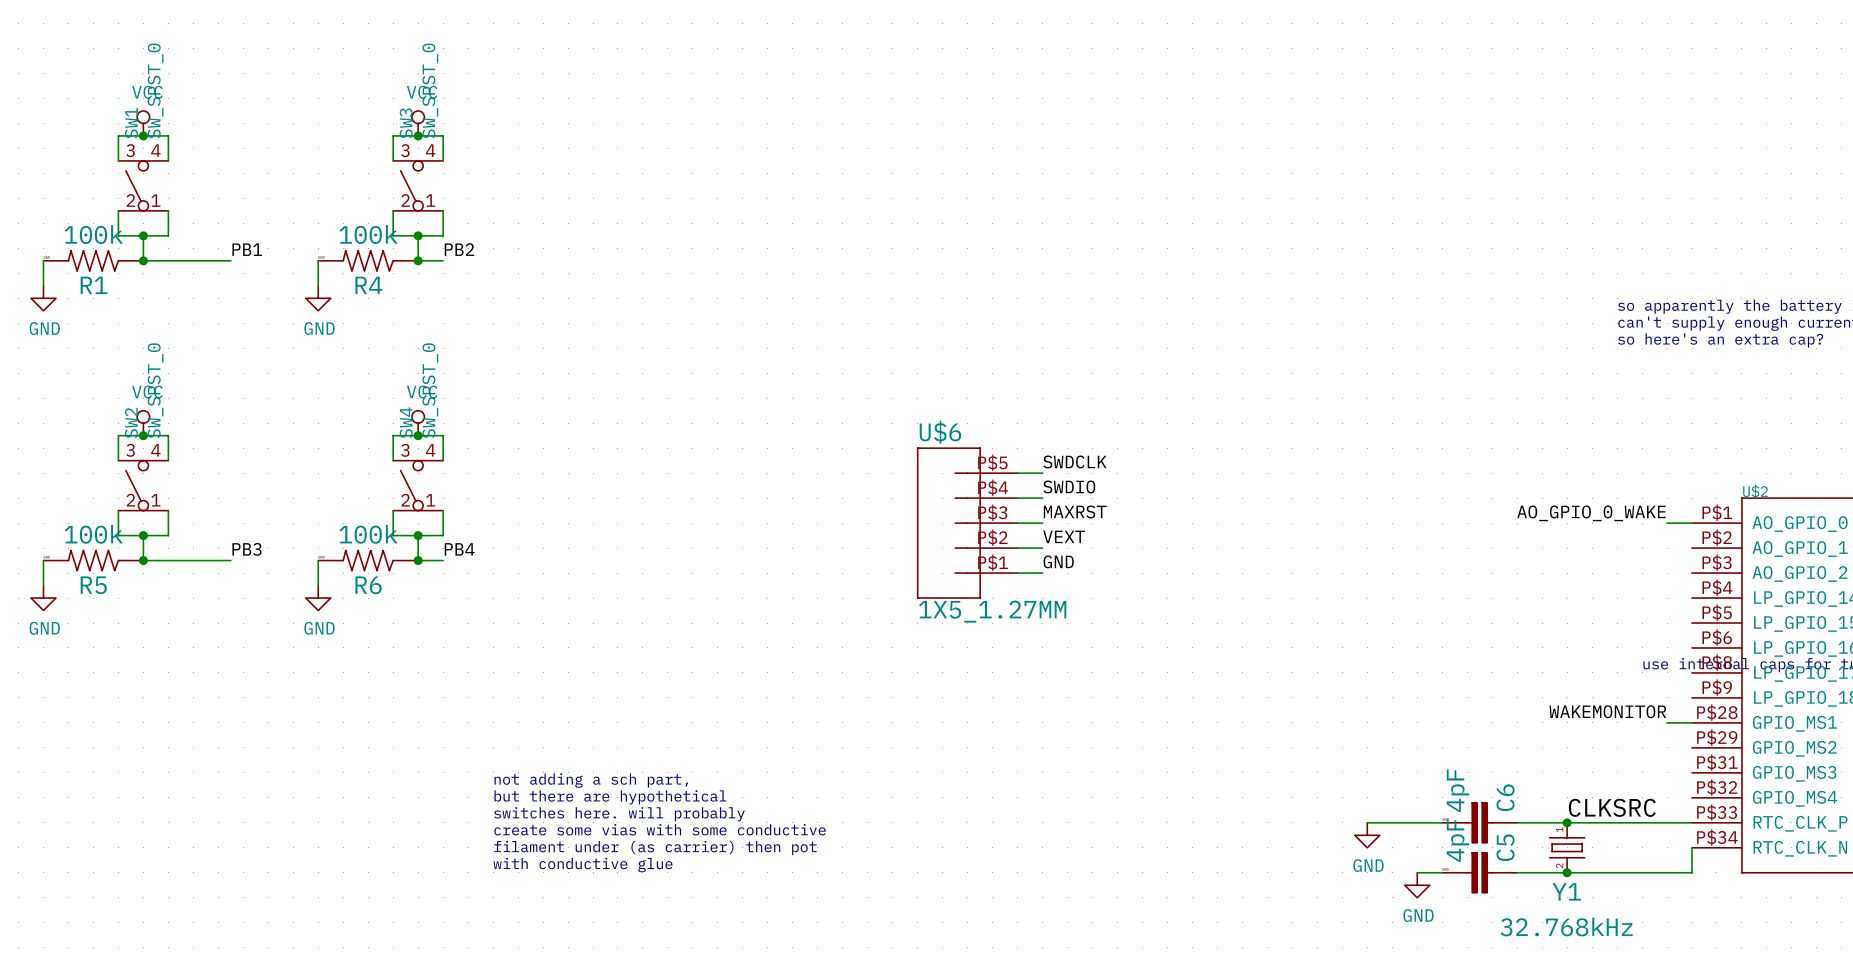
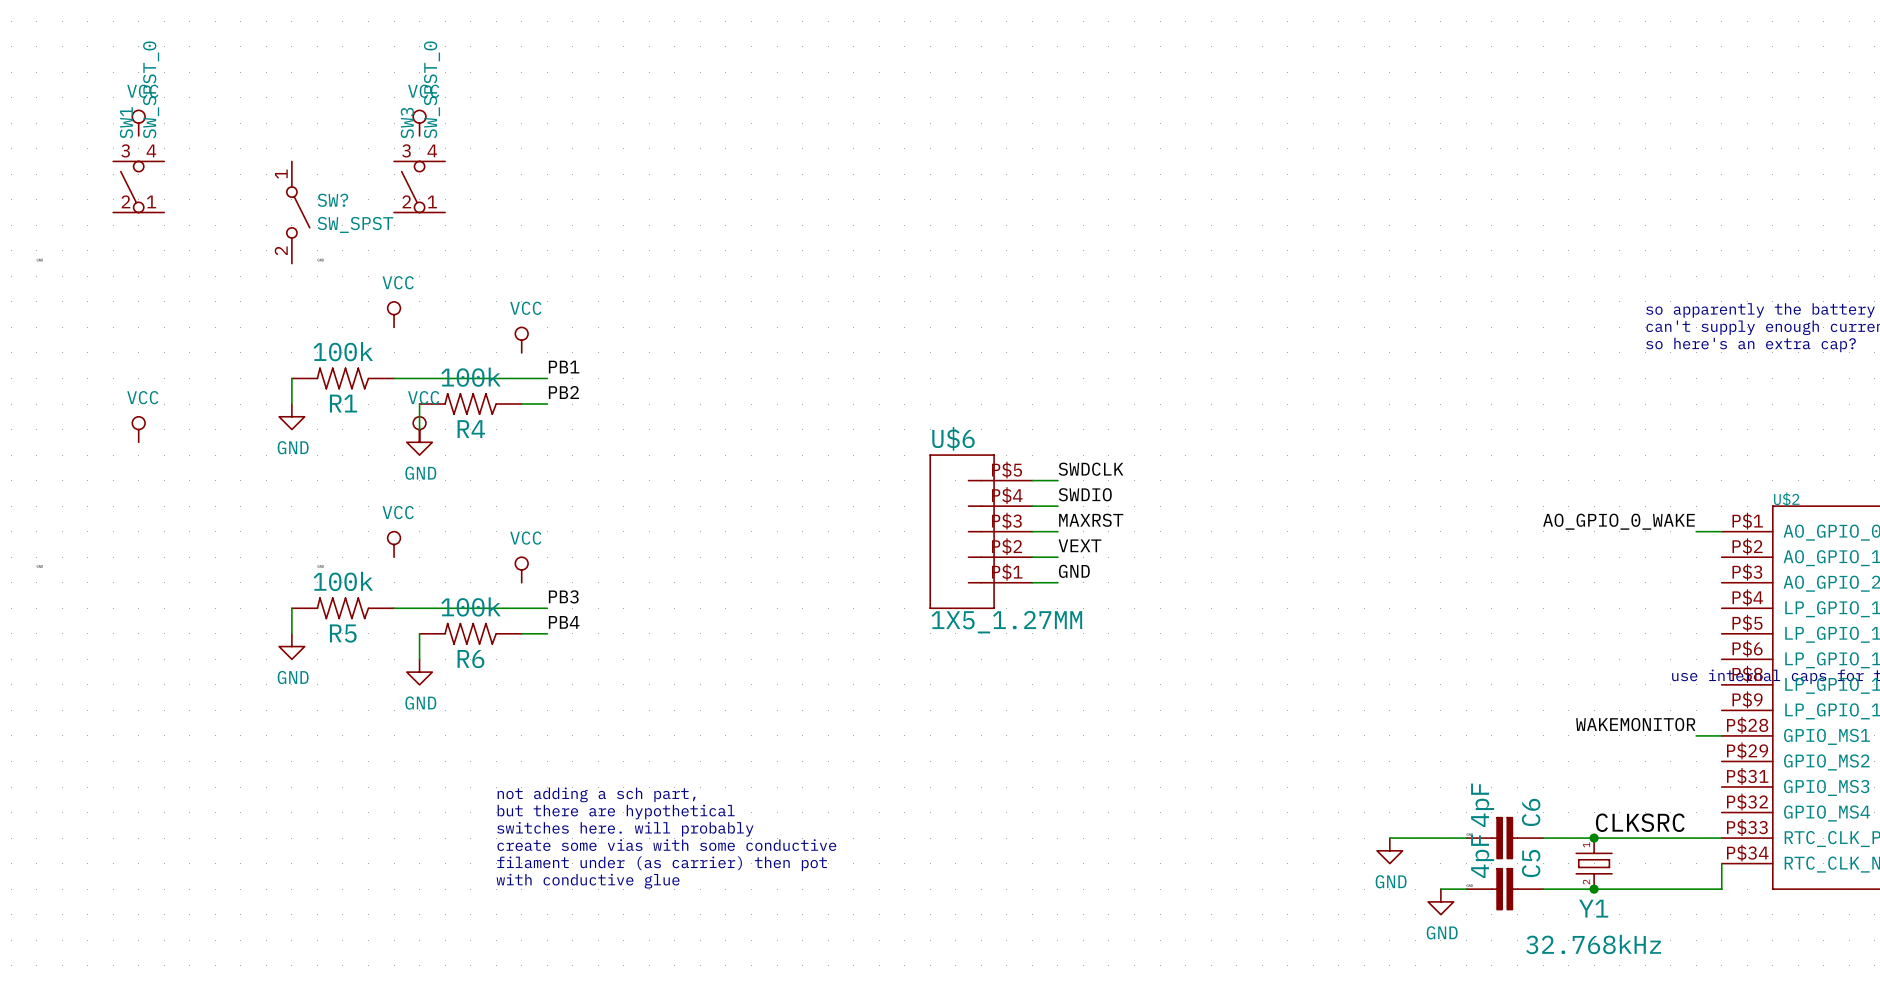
junction: (143, 135) -> none
junction: (418, 135) -> none
wire: (118, 160) (118, 135) (168, 135) (168, 160) -> none
wire: (393, 160) (393, 135) (443, 135) (443, 160) -> none
wire: (118, 210) (118, 235) (168, 235) (168, 210) -> none
SW?: none -> SW_SPST (298, 212)
wire: (393, 210) (393, 235) (443, 235) (443, 210) -> none
wire: (143, 235) (143, 260) (230, 260) -> none
junction: (143, 235) -> none
wire: (418, 235) (418, 260) (443, 260) -> none
junction: (418, 235) -> none
label: PB1 (247, 249) -> none
label position: PB2 (459, 249) -> PB2 (563, 392)
wire: (43, 260) (43, 285) -> none
R1 position: (93, 260) -> (342, 378)
junction: (143, 260) -> none
wire: (318, 260) (318, 285) -> (291, 378) (291, 404)
R4 position: (368, 260) -> (470, 404)
junction: (418, 260) -> none
power symbol: GND (43, 298) -> none
power symbol: GND (318, 298) -> none
power symbol: none -> VCC (394, 314)
power symbol: none -> VCC (521, 340)
label: none -> PB1 (564, 367)
wire: none -> (394, 378) (547, 378)
wire: none -> (419, 404) (419, 429)
wire: none -> (521, 404) (547, 404)
power symbol: none -> GND (291, 416)
junction: (143, 435) -> none
power symbol: none -> GND (419, 442)
junction: (418, 435) -> none
wire: (118, 460) (118, 435) (168, 435) (168, 460) -> none
wire: (393, 460) (393, 435) (443, 435) (443, 460) -> none
SW2: SW_SPST_0 (143, 485) -> none
SW4: SW_SPST_0 (418, 485) -> none
wire: (118, 510) (118, 535) (168, 535) (168, 510) -> none
wire: (393, 510) (393, 535) (443, 535) (443, 510) -> none
wire: (143, 535) (143, 560) (230, 560) -> none
junction: (143, 535) -> none
power symbol: none -> VCC (394, 544)
wire: (418, 535) (418, 560) (443, 560) -> none
junction: (418, 535) -> none
label: PB3 (247, 549) -> none
label position: PB4 (459, 549) -> PB4 (564, 622)
wire: (43, 560) (43, 585) -> none
R5 position: (93, 560) -> (342, 608)
junction: (143, 560) -> none
wire: (318, 560) (318, 585) -> (291, 608) (291, 633)
R6 position: (368, 560) -> (470, 633)
junction: (418, 560) -> none
power symbol: none -> VCC (521, 569)
label: none -> PB3 (563, 596)
power symbol: GND (43, 598) -> none
power symbol position: GND (318, 598) -> GND (291, 646)
wire: none -> (394, 608) (547, 608)
wire: none -> (419, 633) (419, 659)
wire: none -> (521, 633) (547, 633)
power symbol: none -> GND (419, 672)

